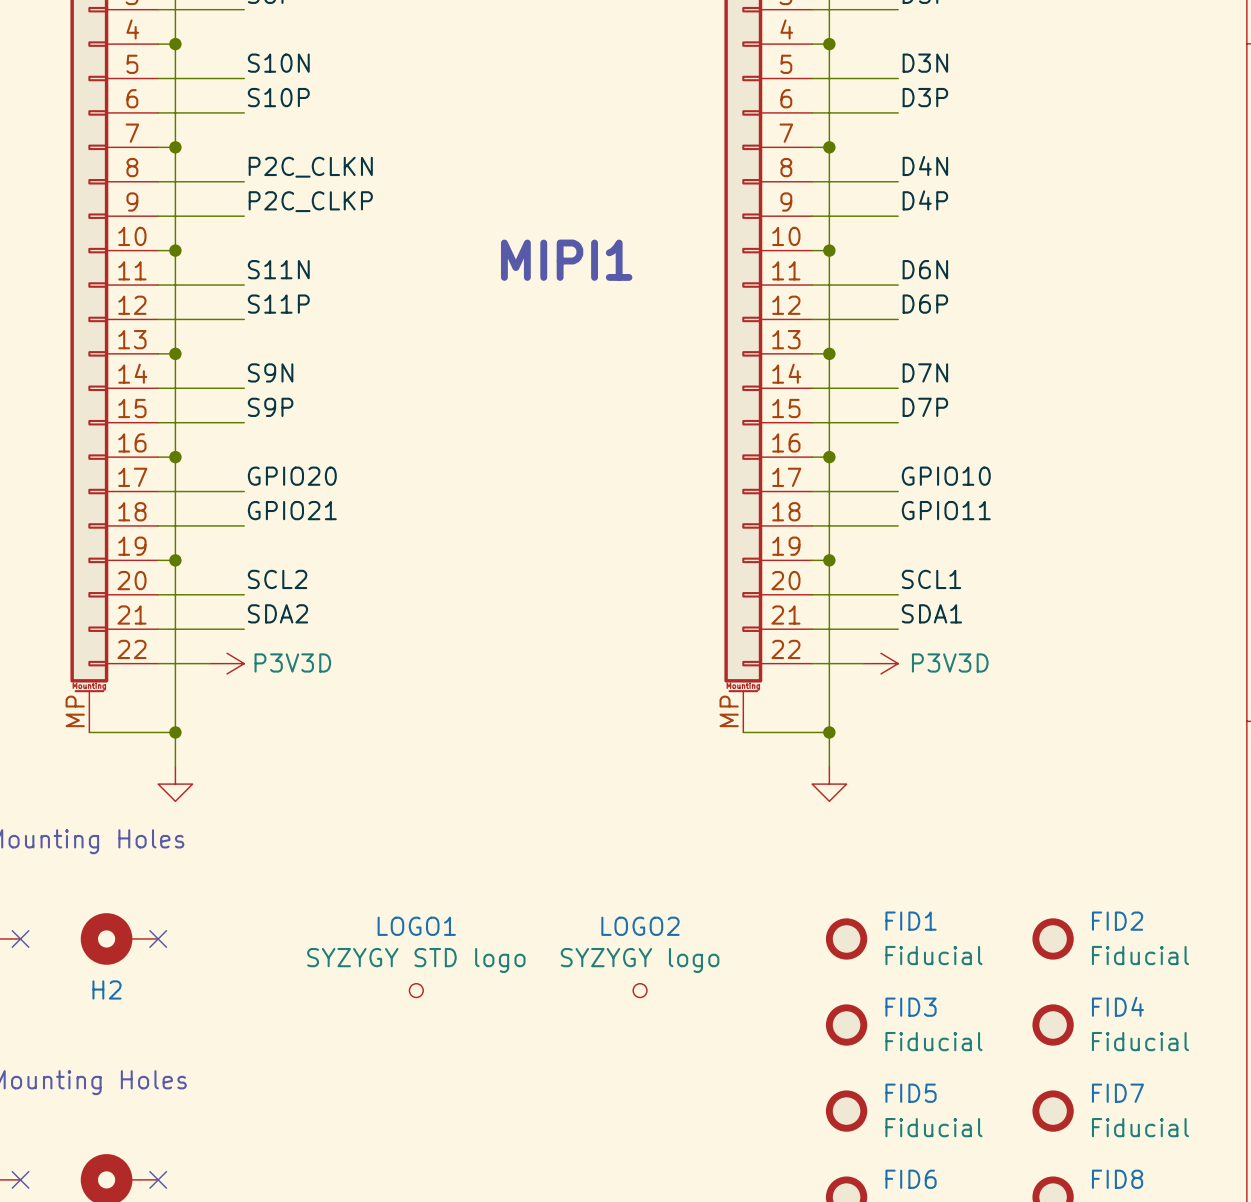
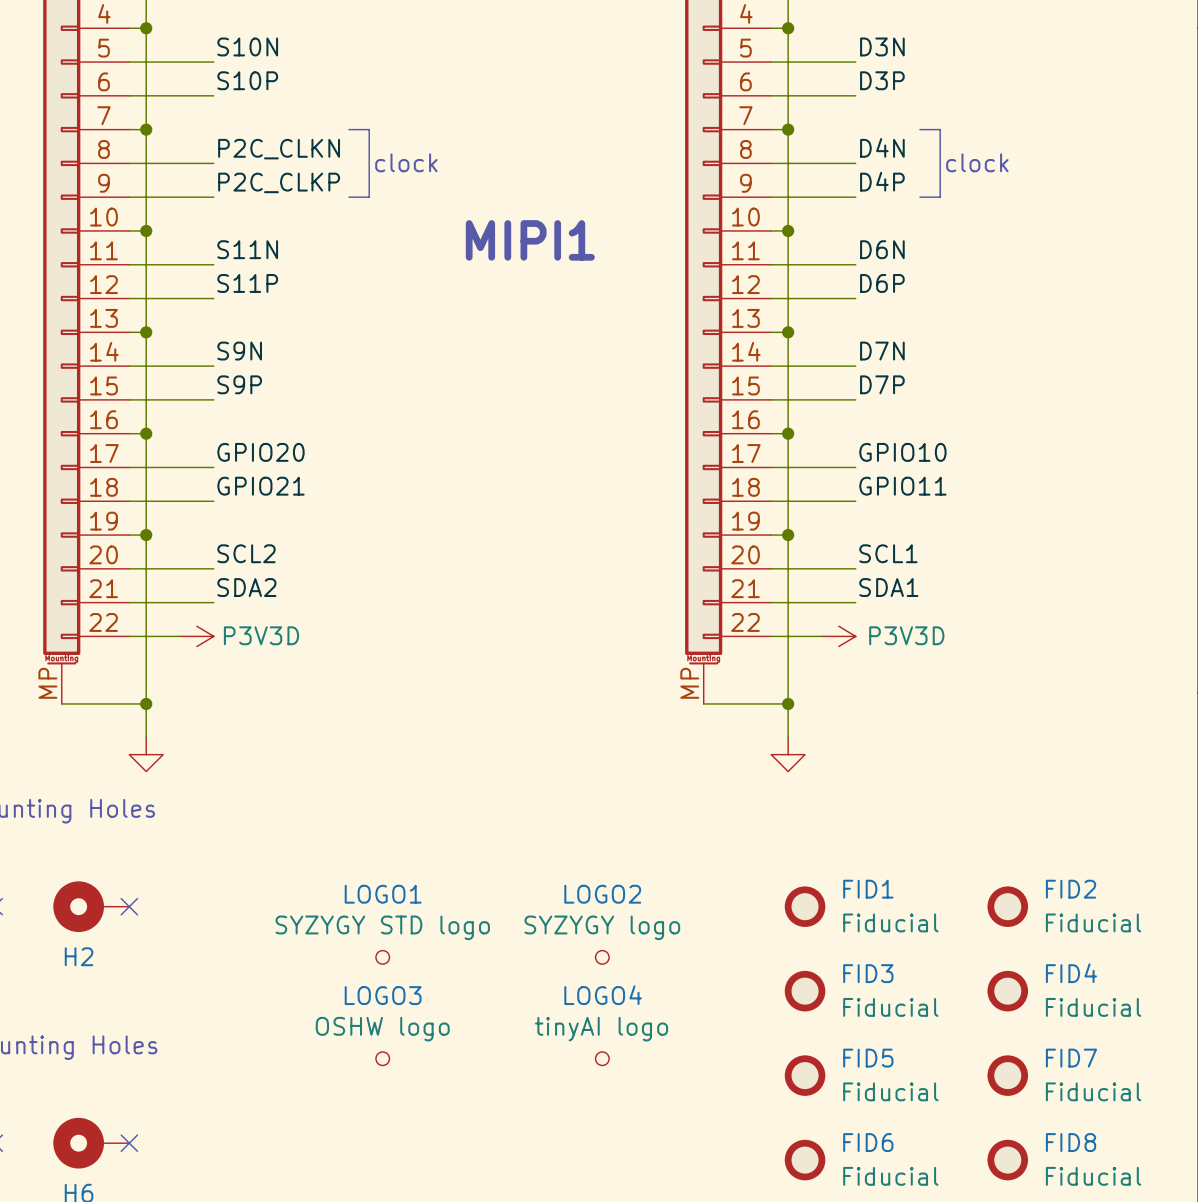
line: none -> (348, 129) (369, 129) (369, 197) (348, 197)
line: none -> (919, 129) (940, 129) (940, 197) (919, 197)
text: none -> clock (406, 162)
text: none -> clock (977, 162)
LOGO3: none -> OSHW logo (382, 1058)
LOGO4: none -> tinyAI logo (602, 1058)

